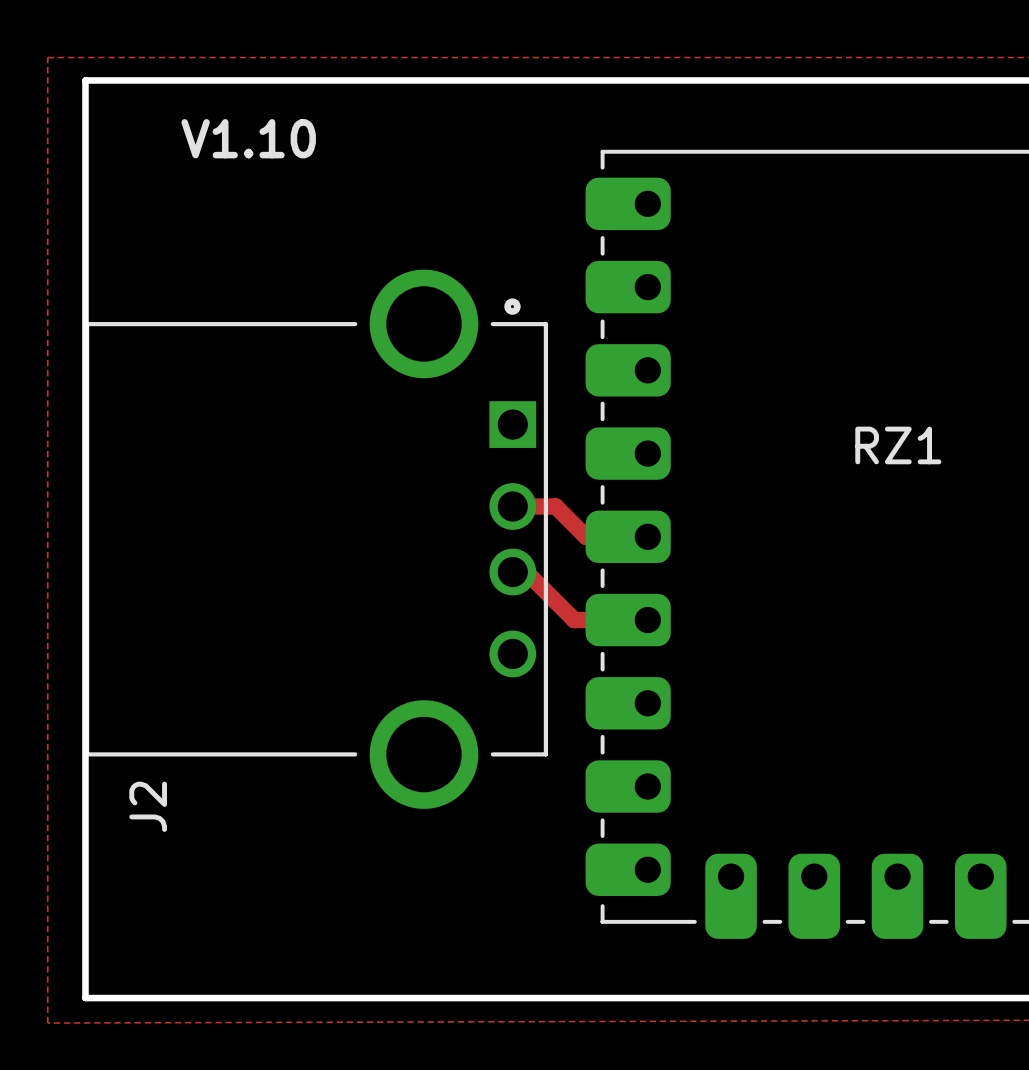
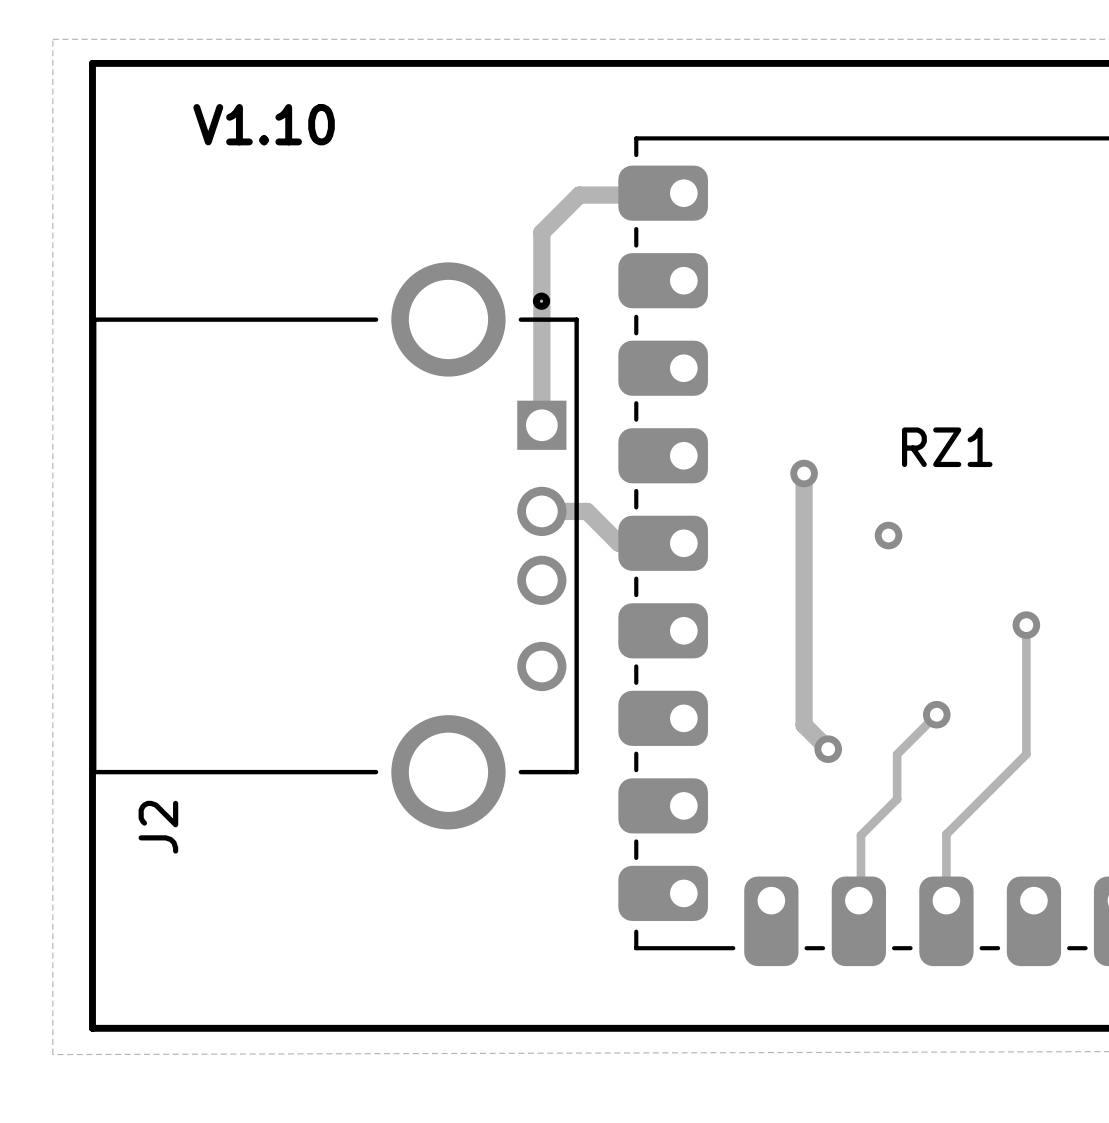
track: none -> (683, 195) (579, 195) (541, 232) (541, 423)
track: none -> (804, 473) (804, 725) (828, 749)
via: none -> (804, 473)
via: none -> (888, 535)
track: (512, 572) (526, 572) (574, 620) (647, 620) -> none
track: none -> (1026, 625) (1026, 754) (946, 834) (946, 902)
via: none -> (1026, 625)
track: none -> (936, 714) (897, 754) (897, 799) (860, 835) (860, 900)
via: none -> (936, 714)
via: none -> (828, 749)

